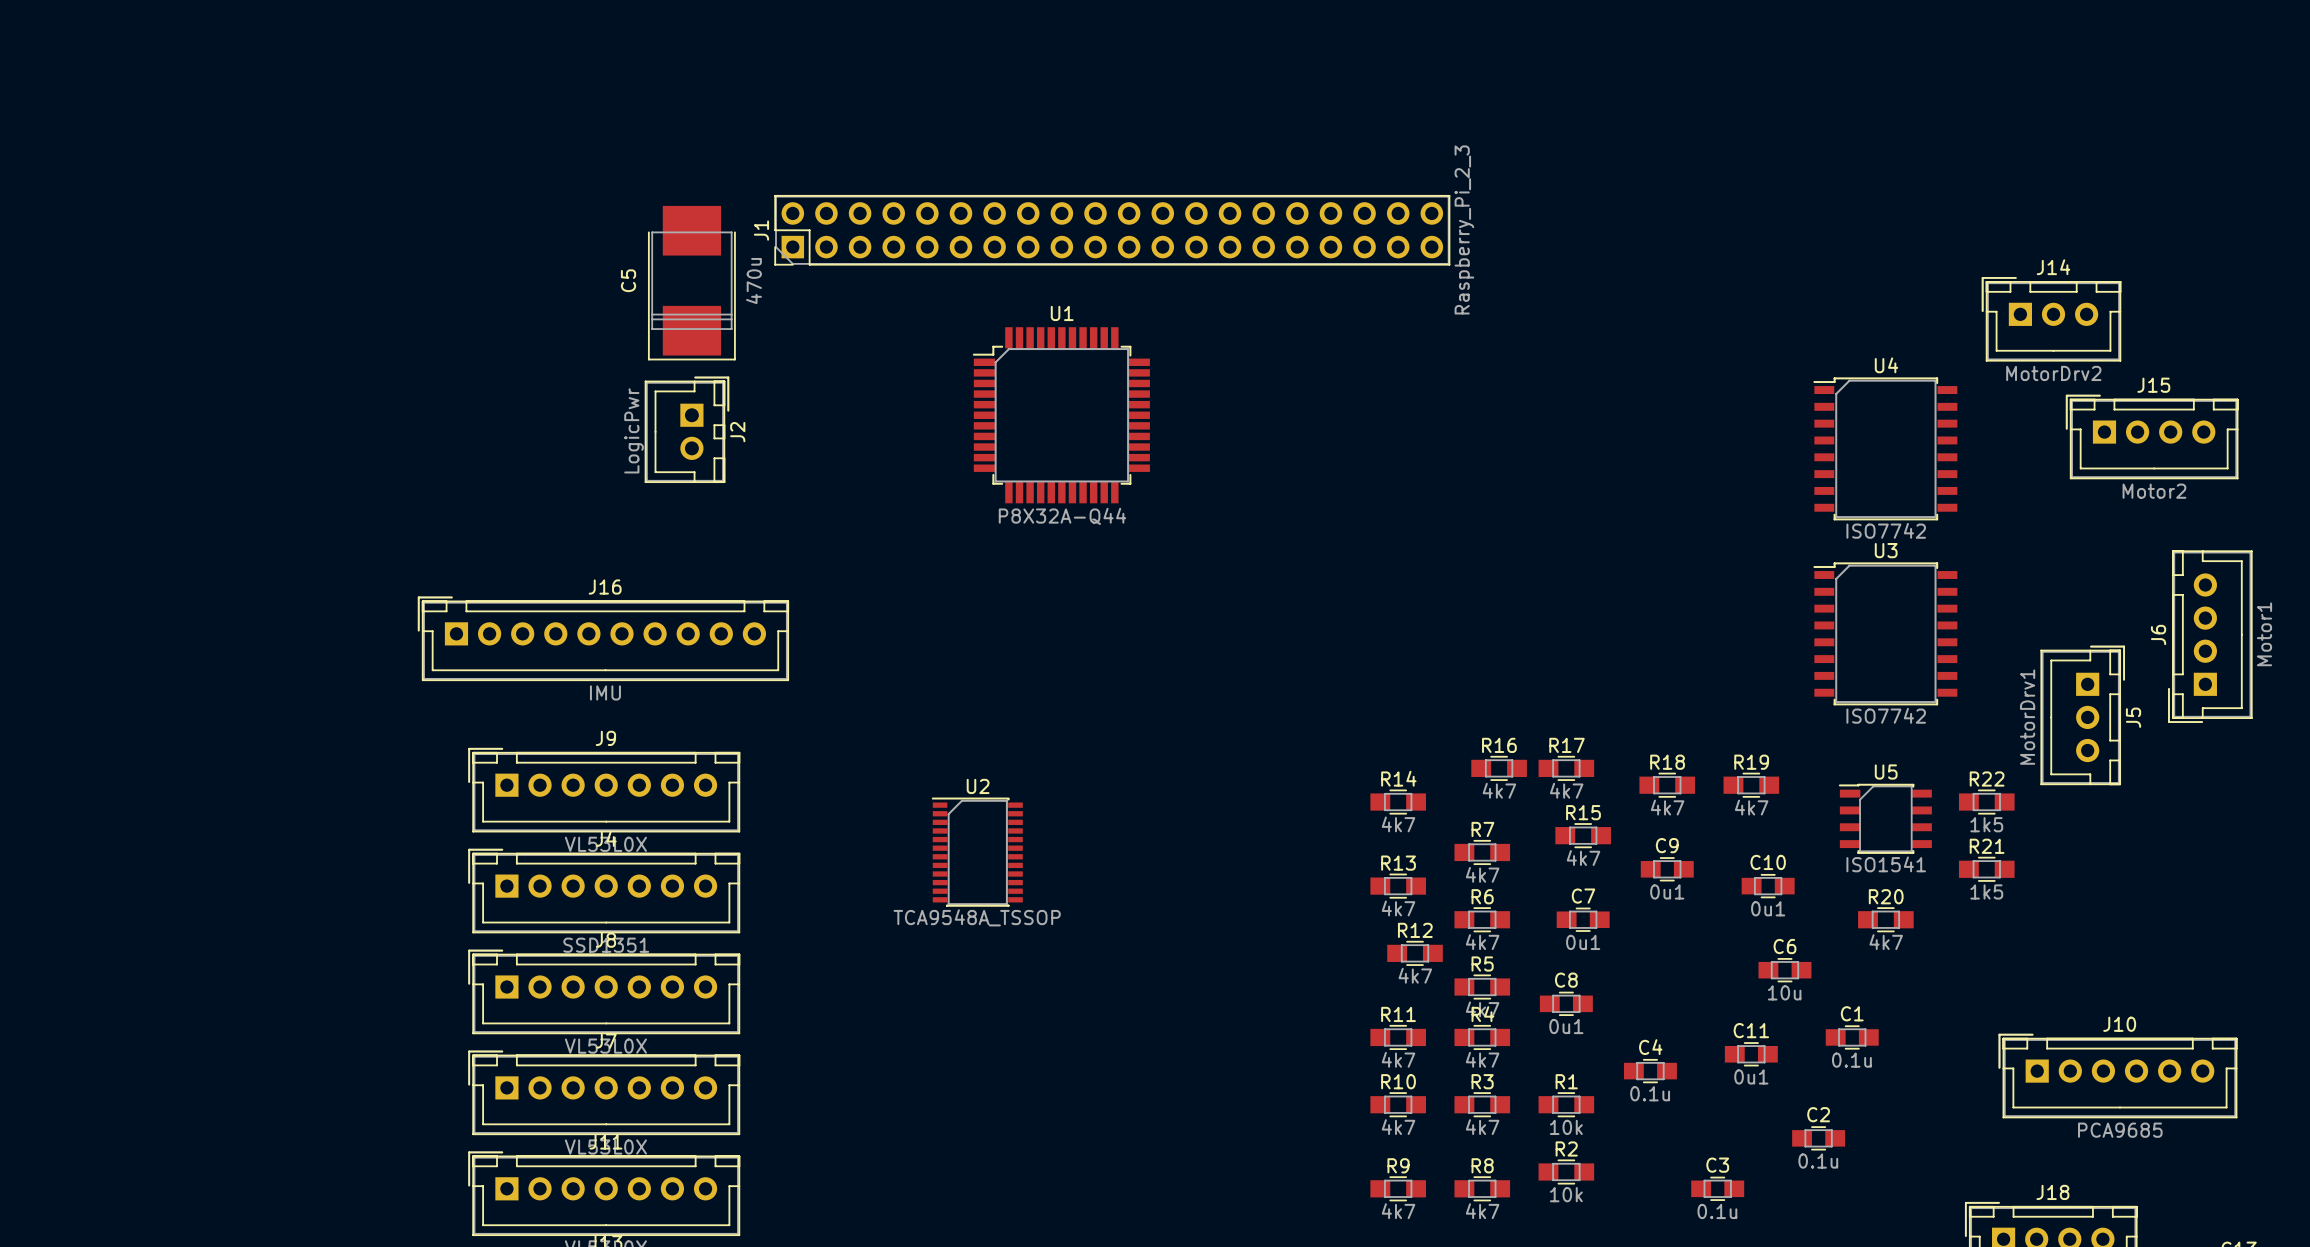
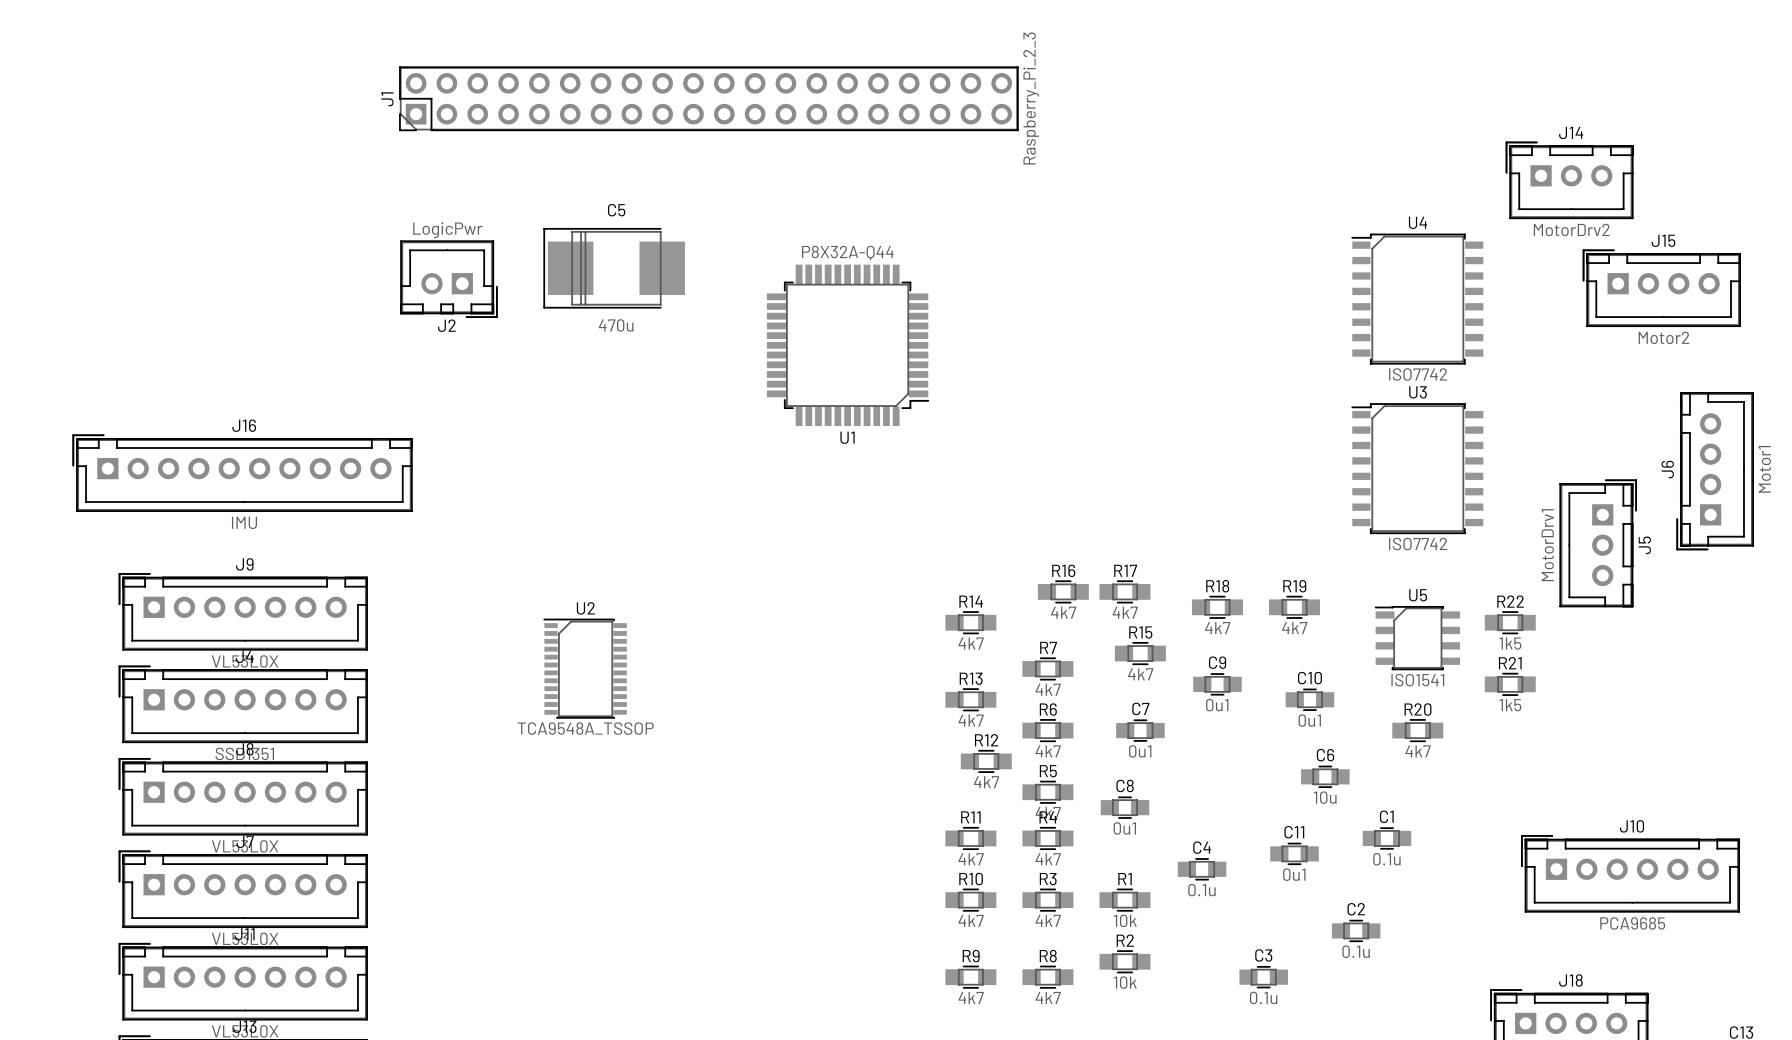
C5 rotation: 0° (691, 283) -> 90° clockwise (614, 268)
C5 position: (691, 283) -> (614, 268)
U1 rotation: 0° (1061, 415) -> 180° (848, 345)
U1 position: (1061, 415) -> (848, 345)
J2 rotation: 0° (686, 429) -> 90° clockwise (448, 279)
J2 position: (686, 429) -> (448, 279)

